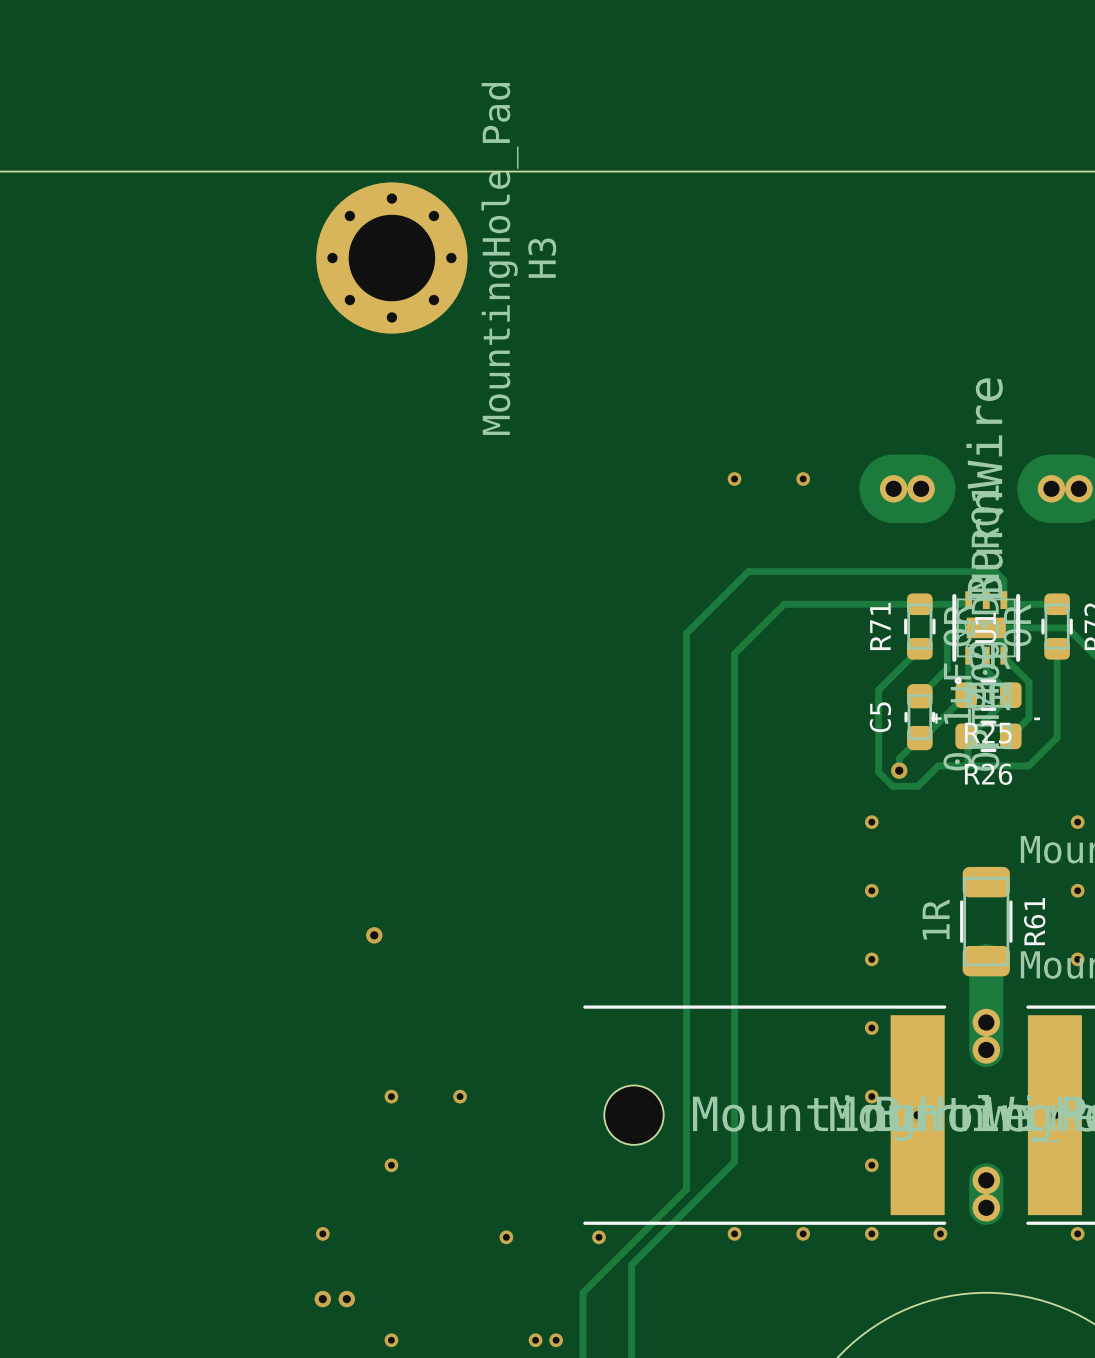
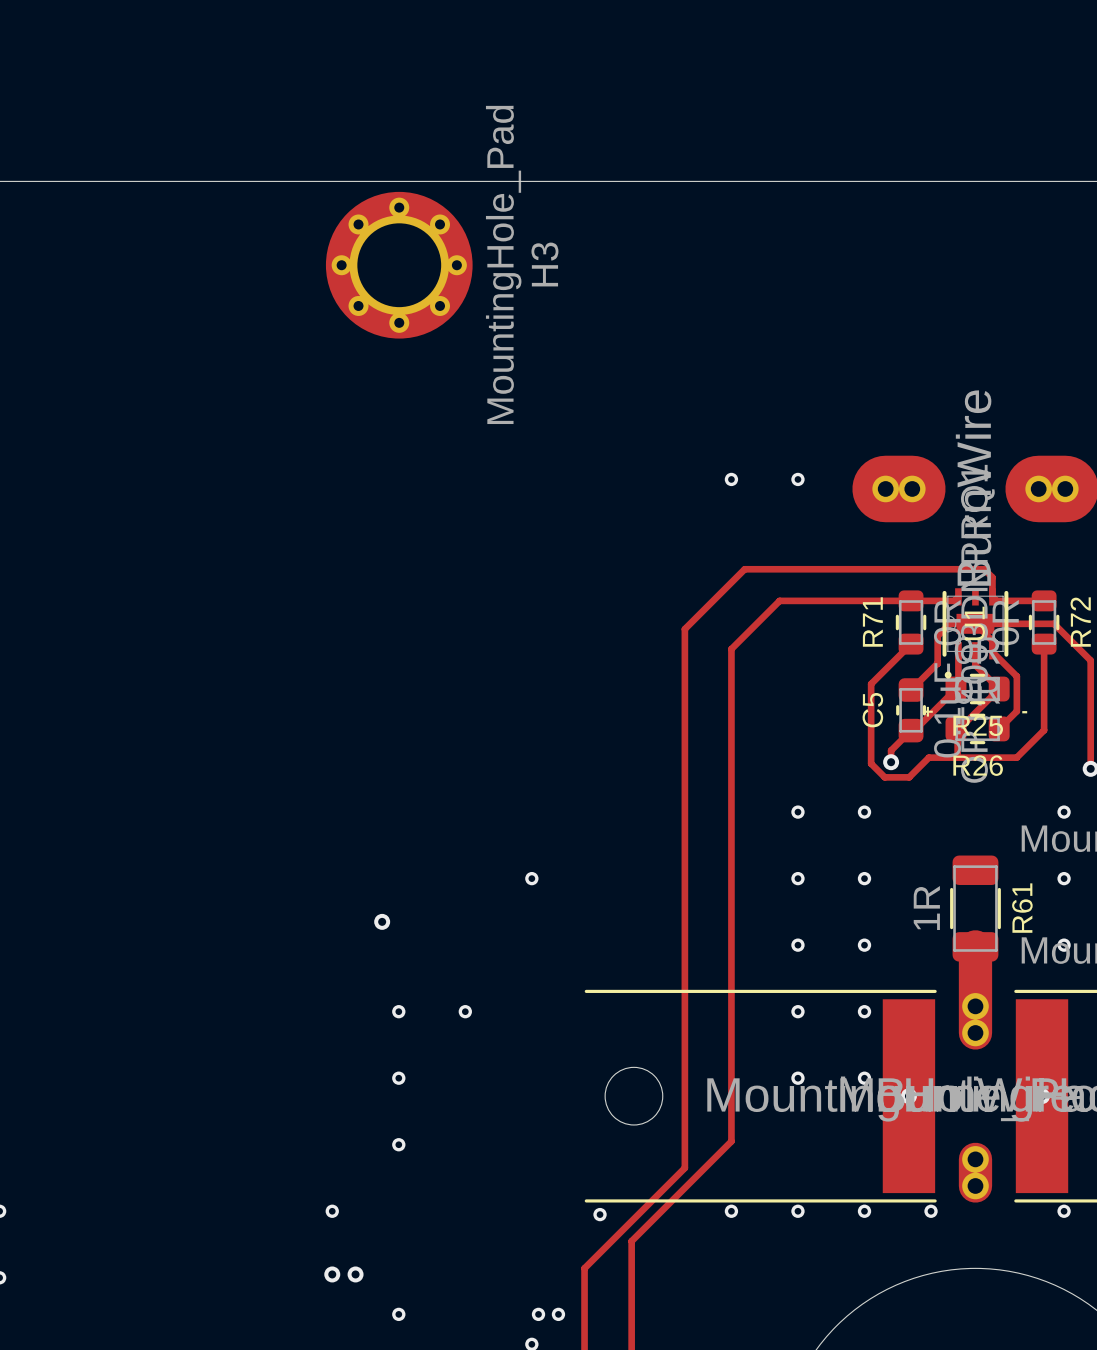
via: none -> (797, 812)
via: none -> (531, 878)
via: none -> (797, 878)
via: none -> (797, 945)
via: none -> (398, 1011)
via: none -> (465, 1011)
via: none -> (797, 1011)
via: (460, 1096) -> none
via: none -> (797, 1078)
via: (871, 1165) -> none
via: (506, 1237) -> none

